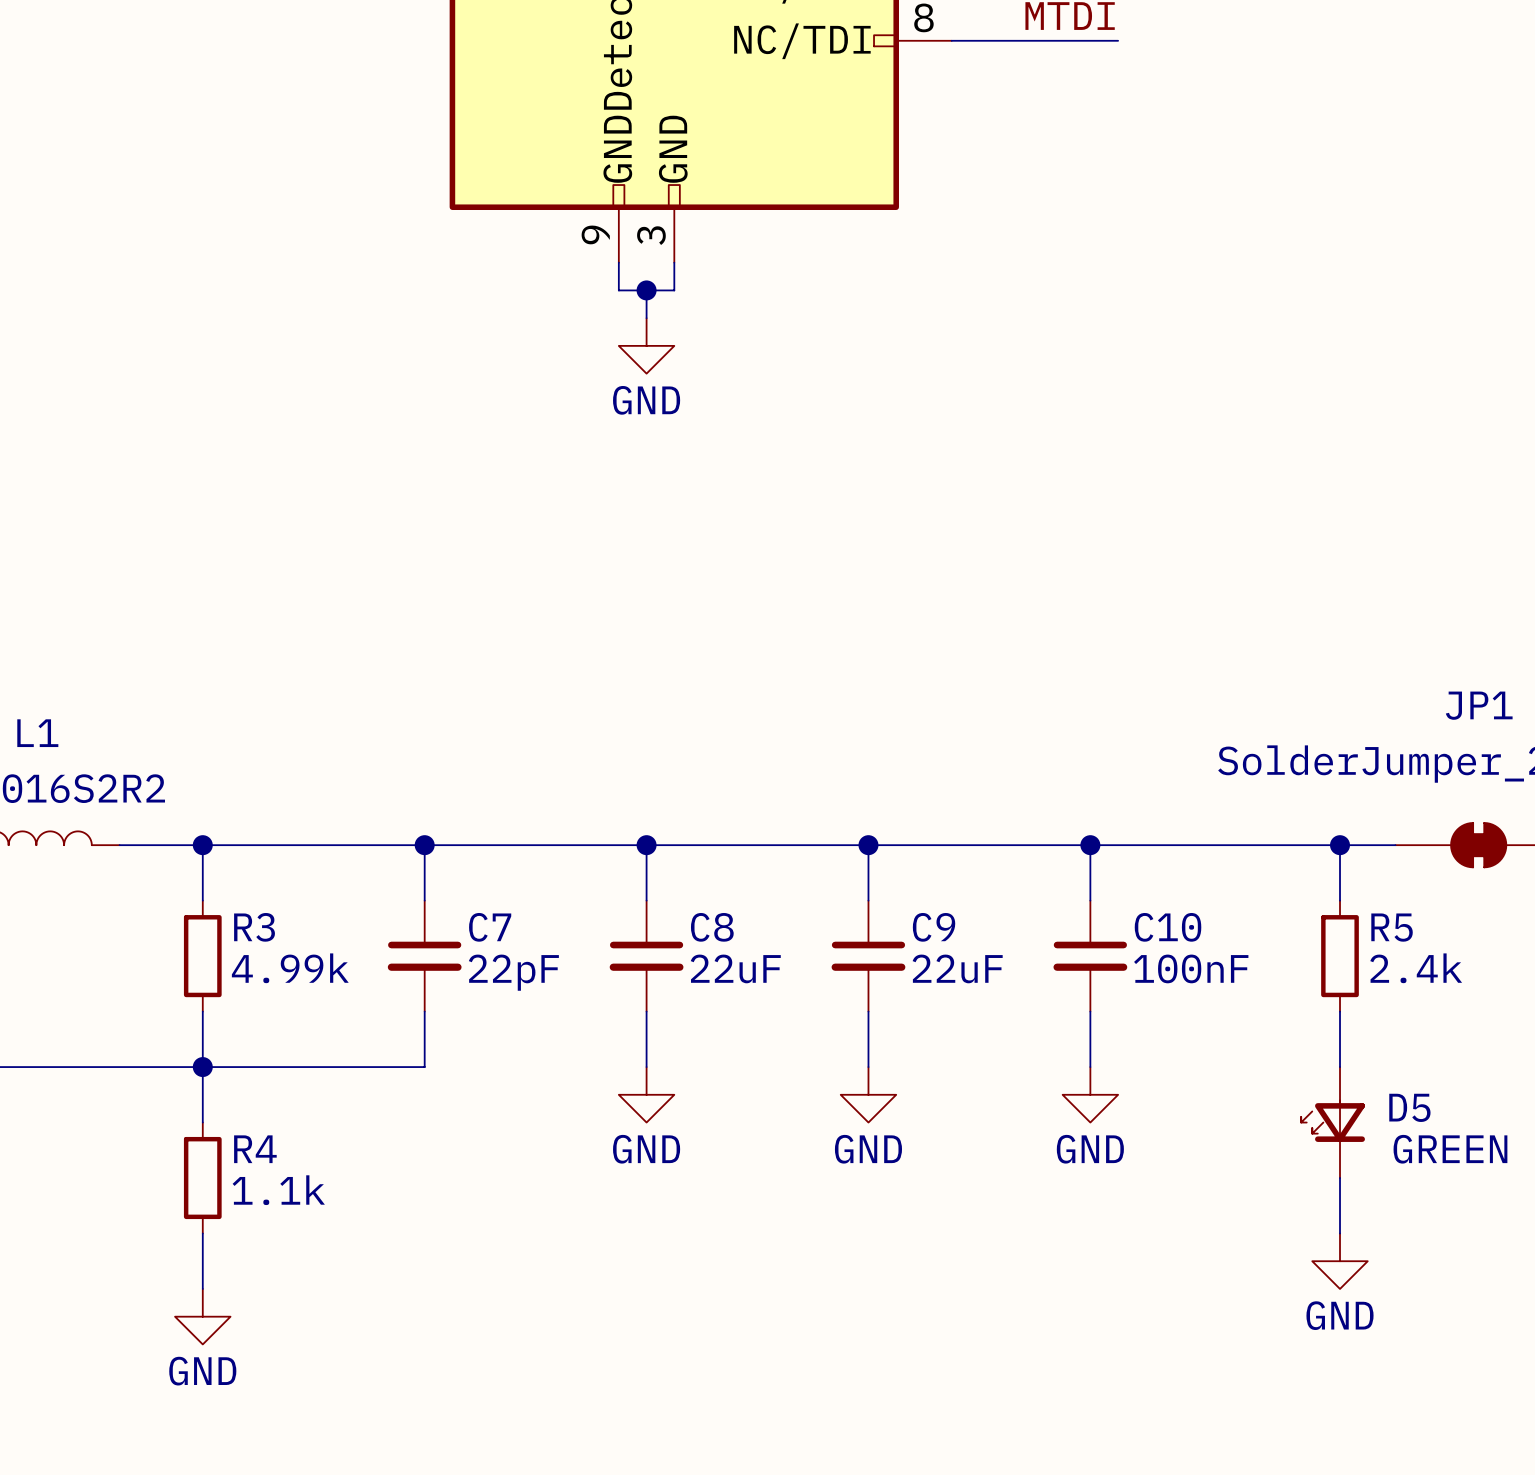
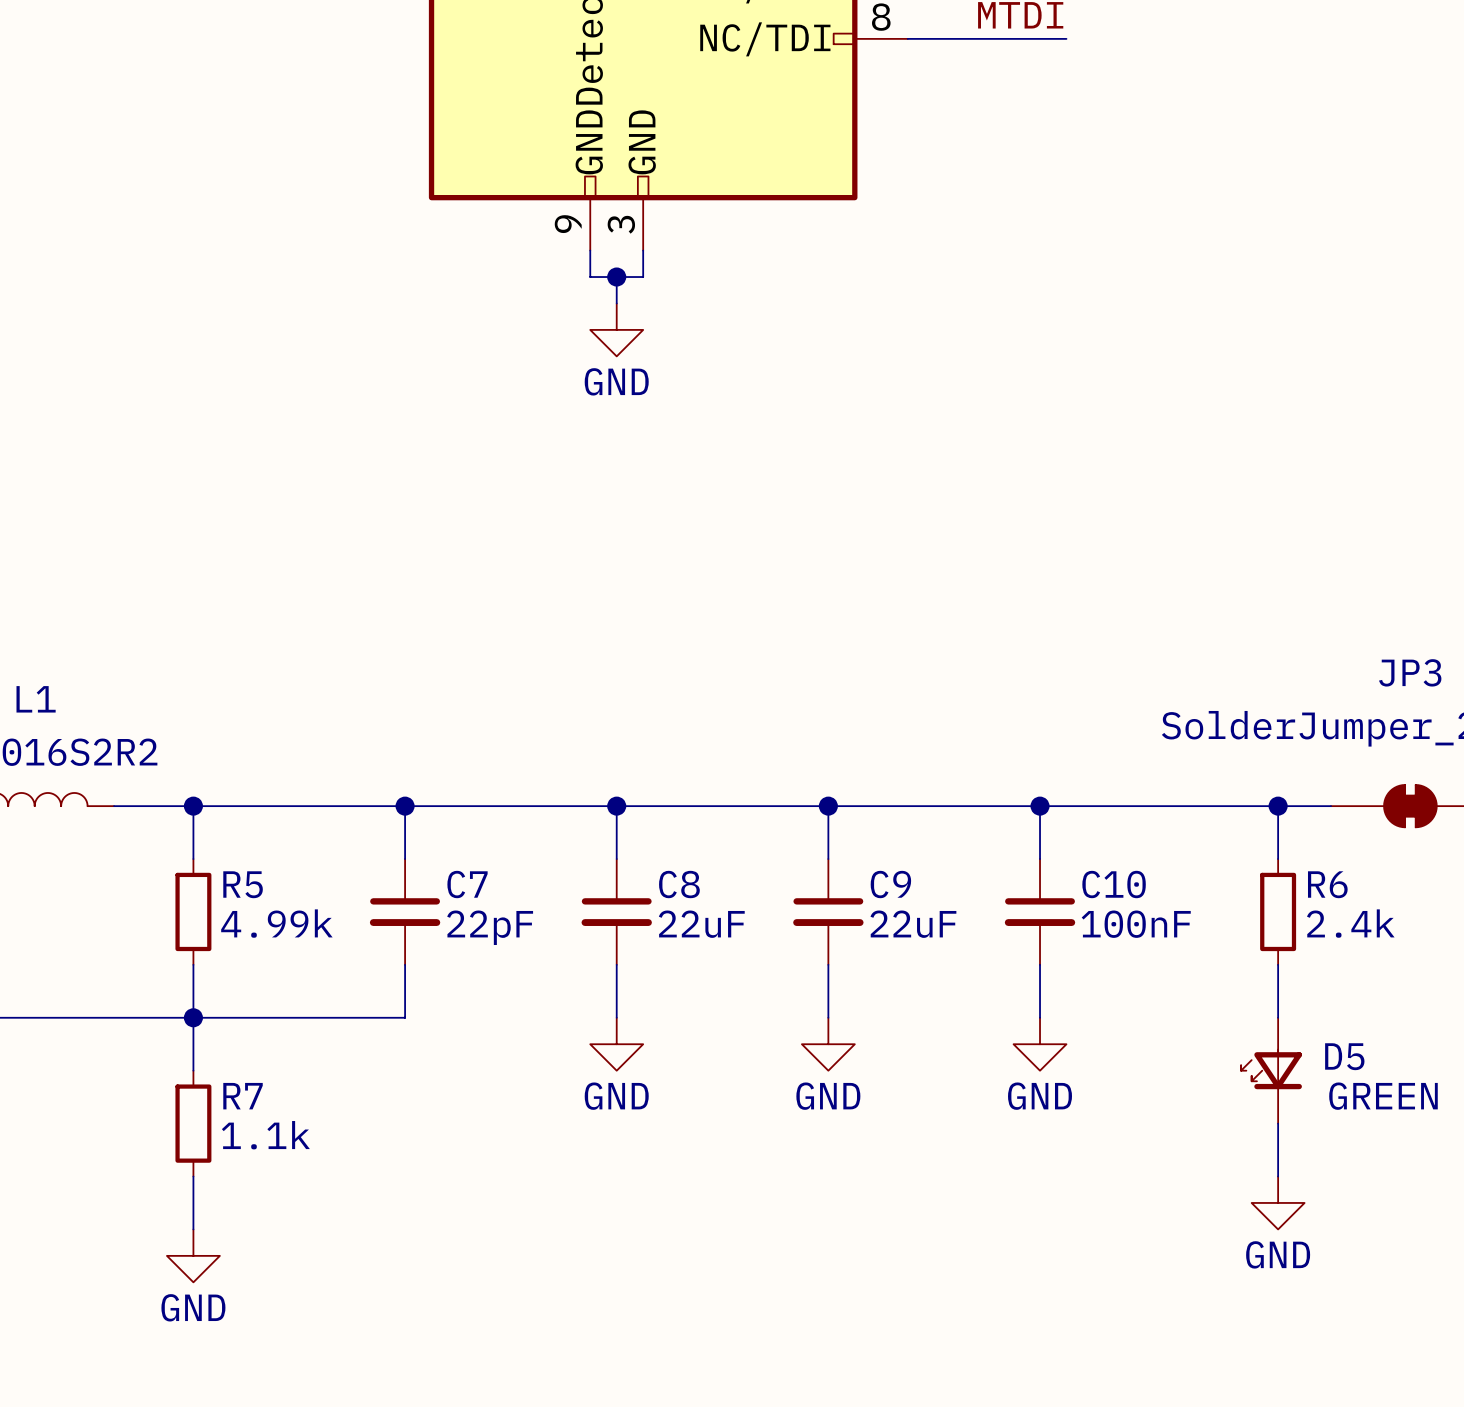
JP1 name: JP1 (1479, 705) -> JP3 (1410, 672)
R3 name: R3 (254, 927) -> R5 (243, 884)
R5 name: R5 (1392, 927) -> R6 (1327, 884)
R4 name: R4 (255, 1149) -> R7 (243, 1096)

